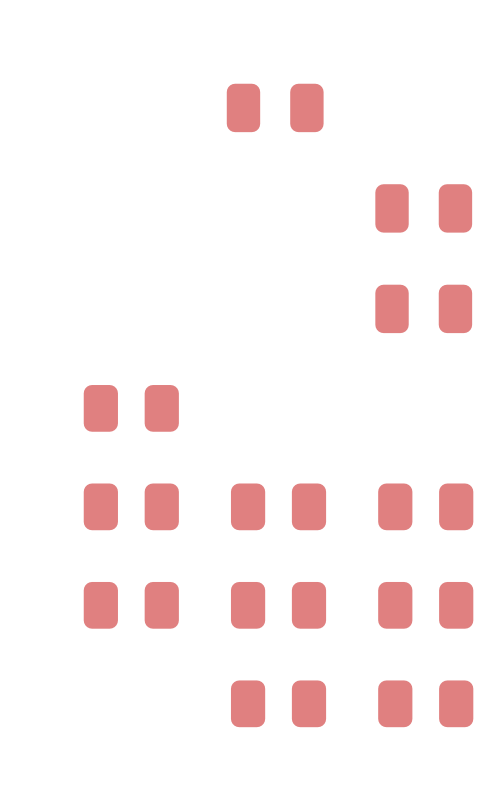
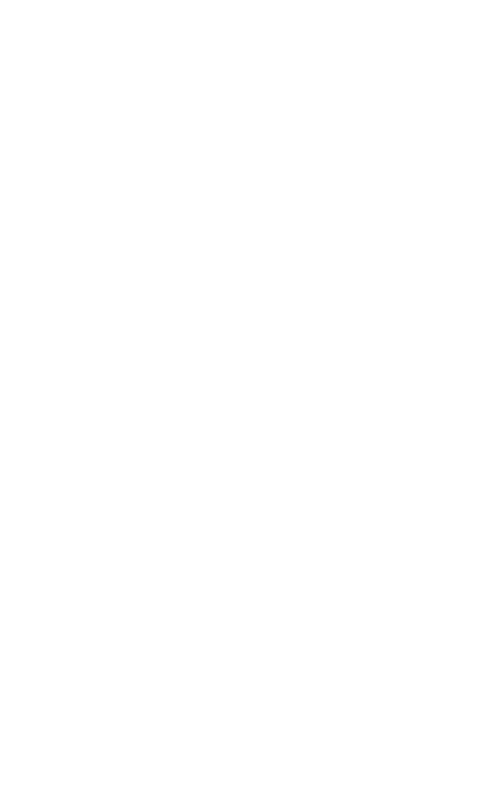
part: (275, 107) -> none
part: (423, 208) -> none
part: (423, 308) -> none
part: (131, 408) -> none
part: (131, 506) -> none
part: (278, 506) -> none
part: (425, 506) -> none
part: (131, 605) -> none
part: (278, 605) -> none
part: (425, 605) -> none
part: (278, 703) -> none
part: (425, 703) -> none

